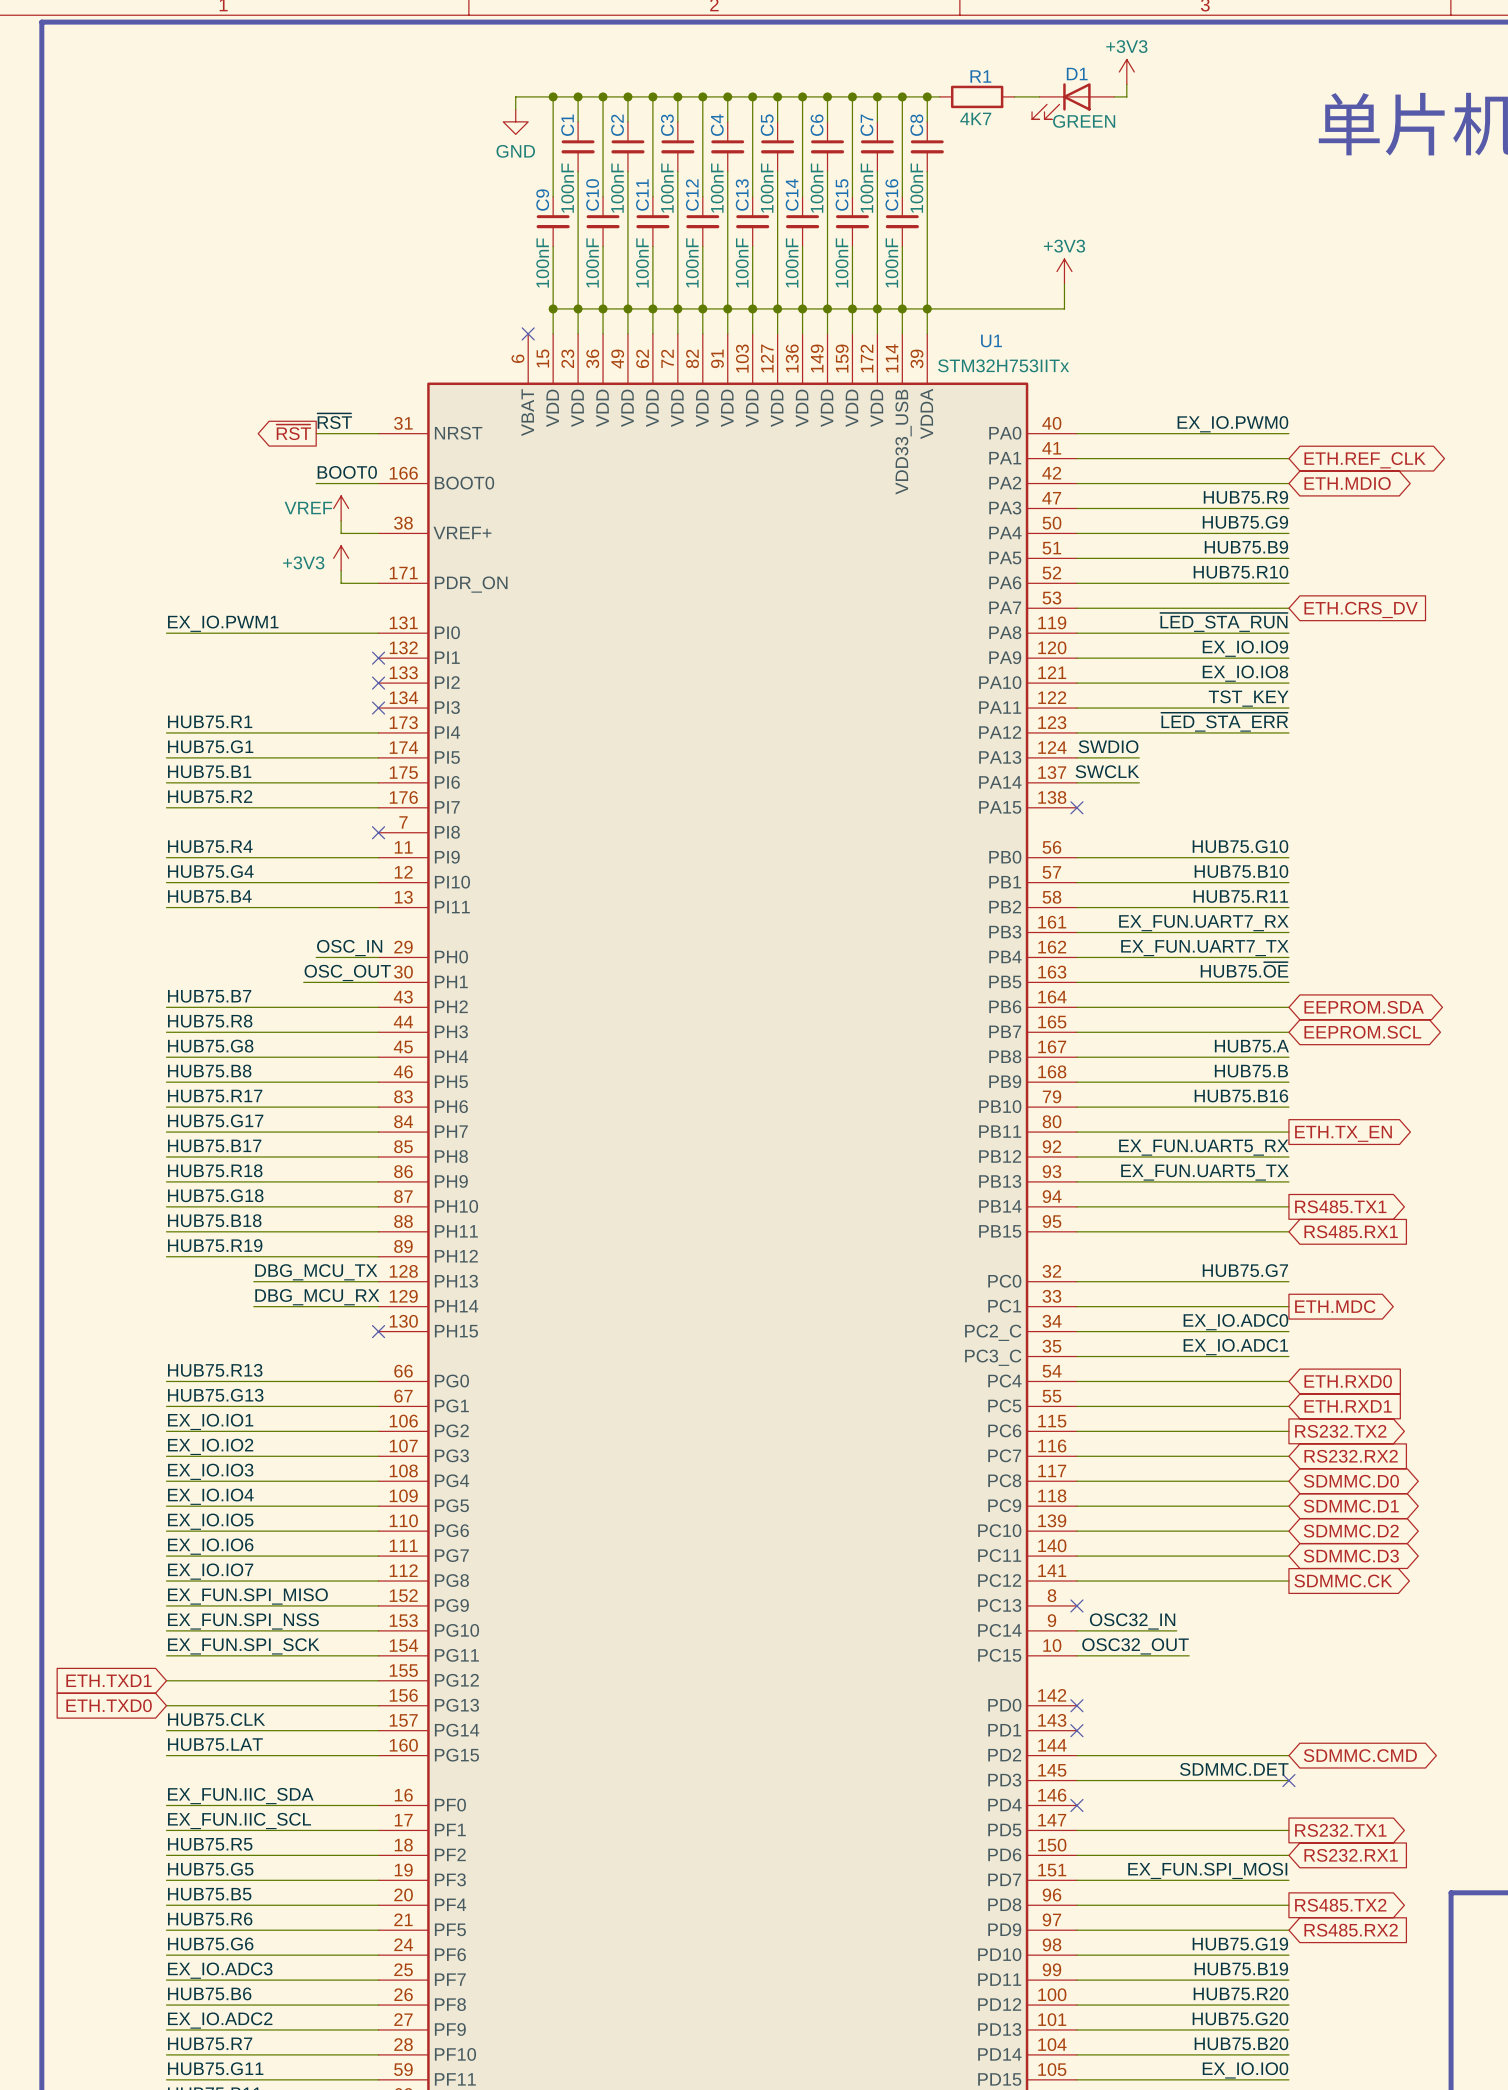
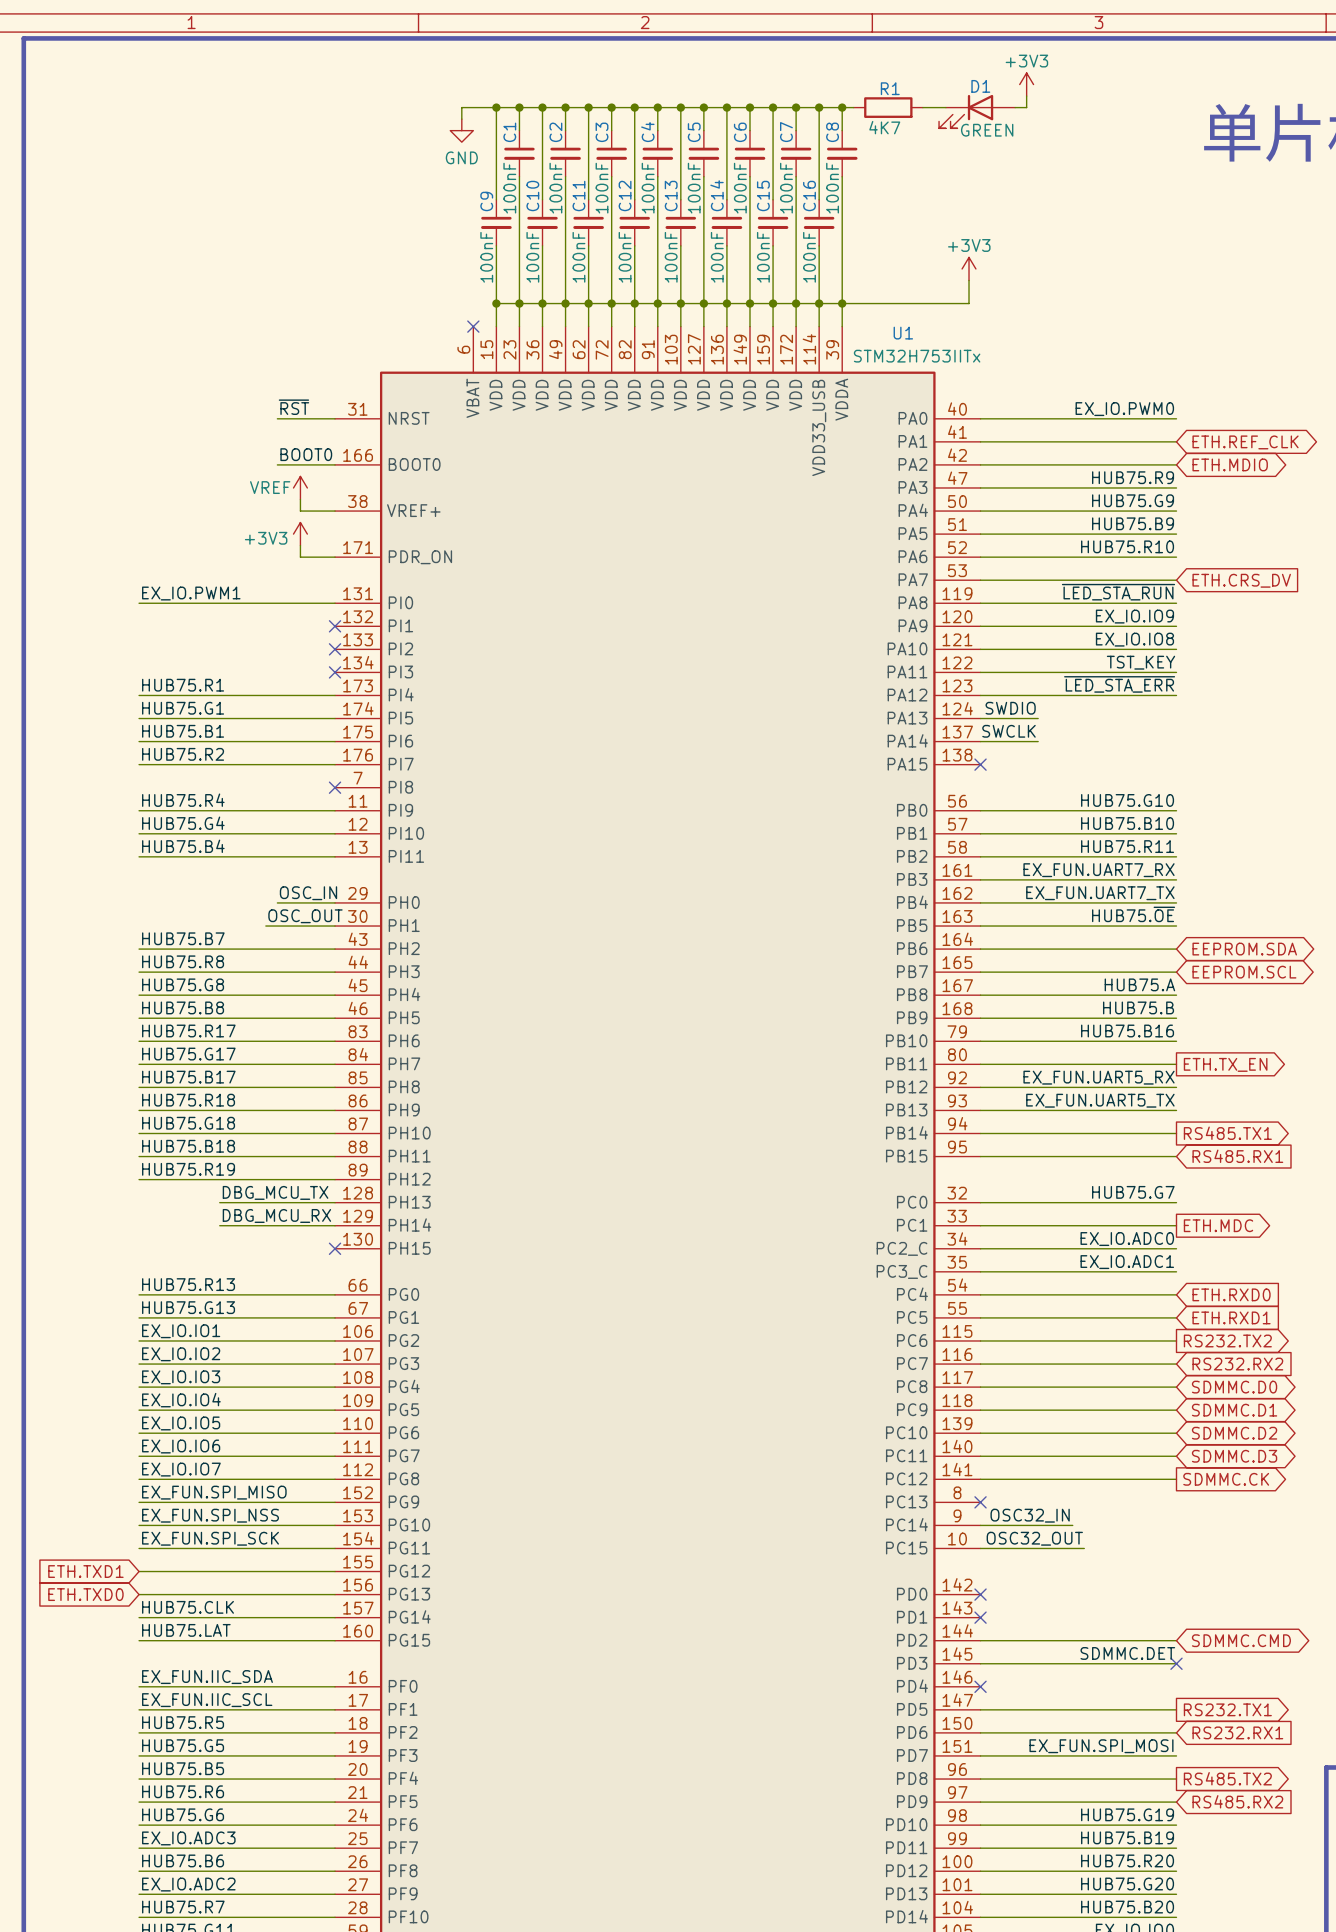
global label: ~{RST} (293, 432) -> none

